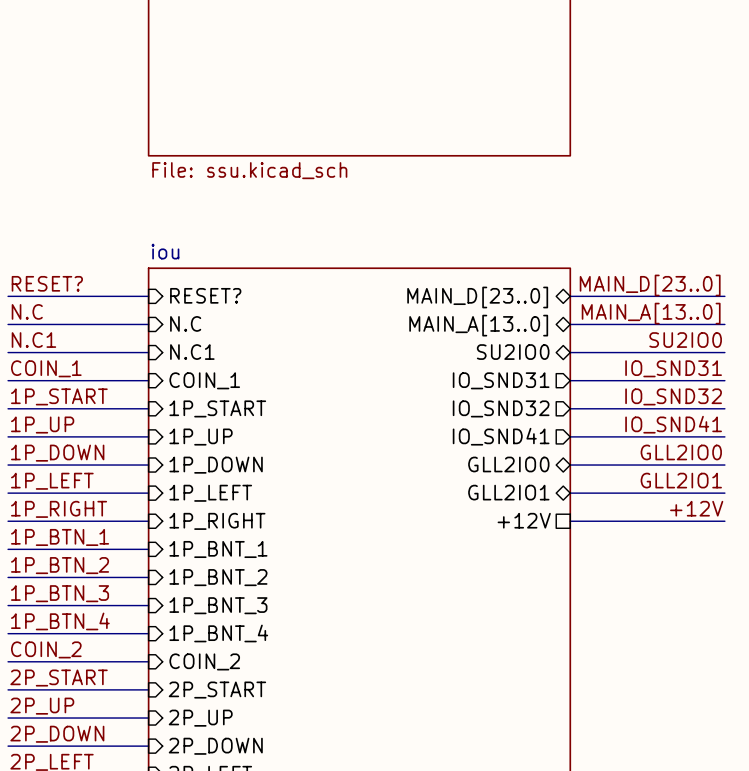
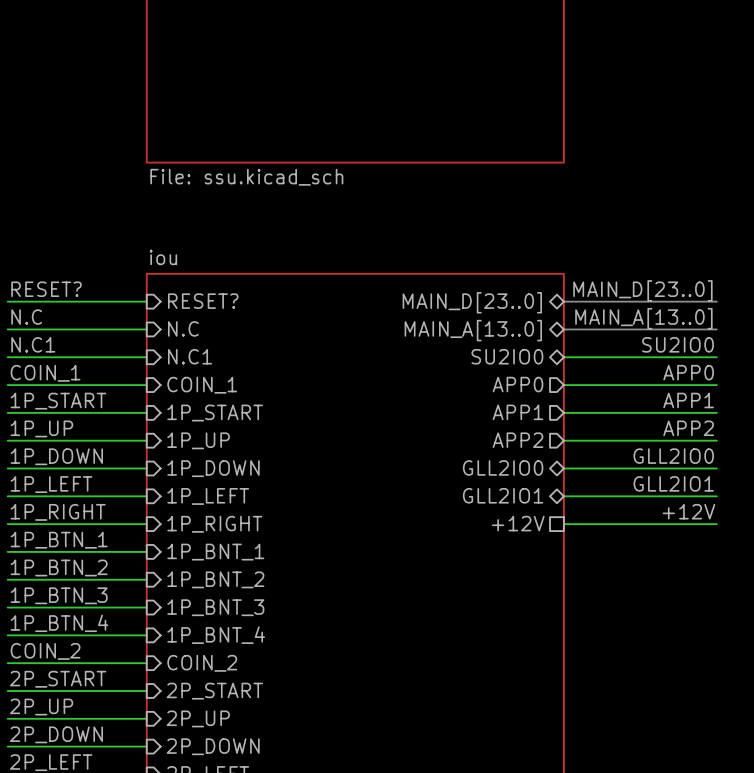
label: IO_SND31 (673, 368) -> APP0 (688, 372)
sheet pin: IO_SND31 (501, 380) -> APP0 (517, 384)
label: IO_SND32 (673, 396) -> APP1 (688, 400)
sheet pin: IO_SND32 (501, 408) -> APP1 (517, 412)
label: IO_SND41 (673, 424) -> APP2 (688, 428)
sheet pin: IO_SND41 (501, 436) -> APP2 (517, 440)

